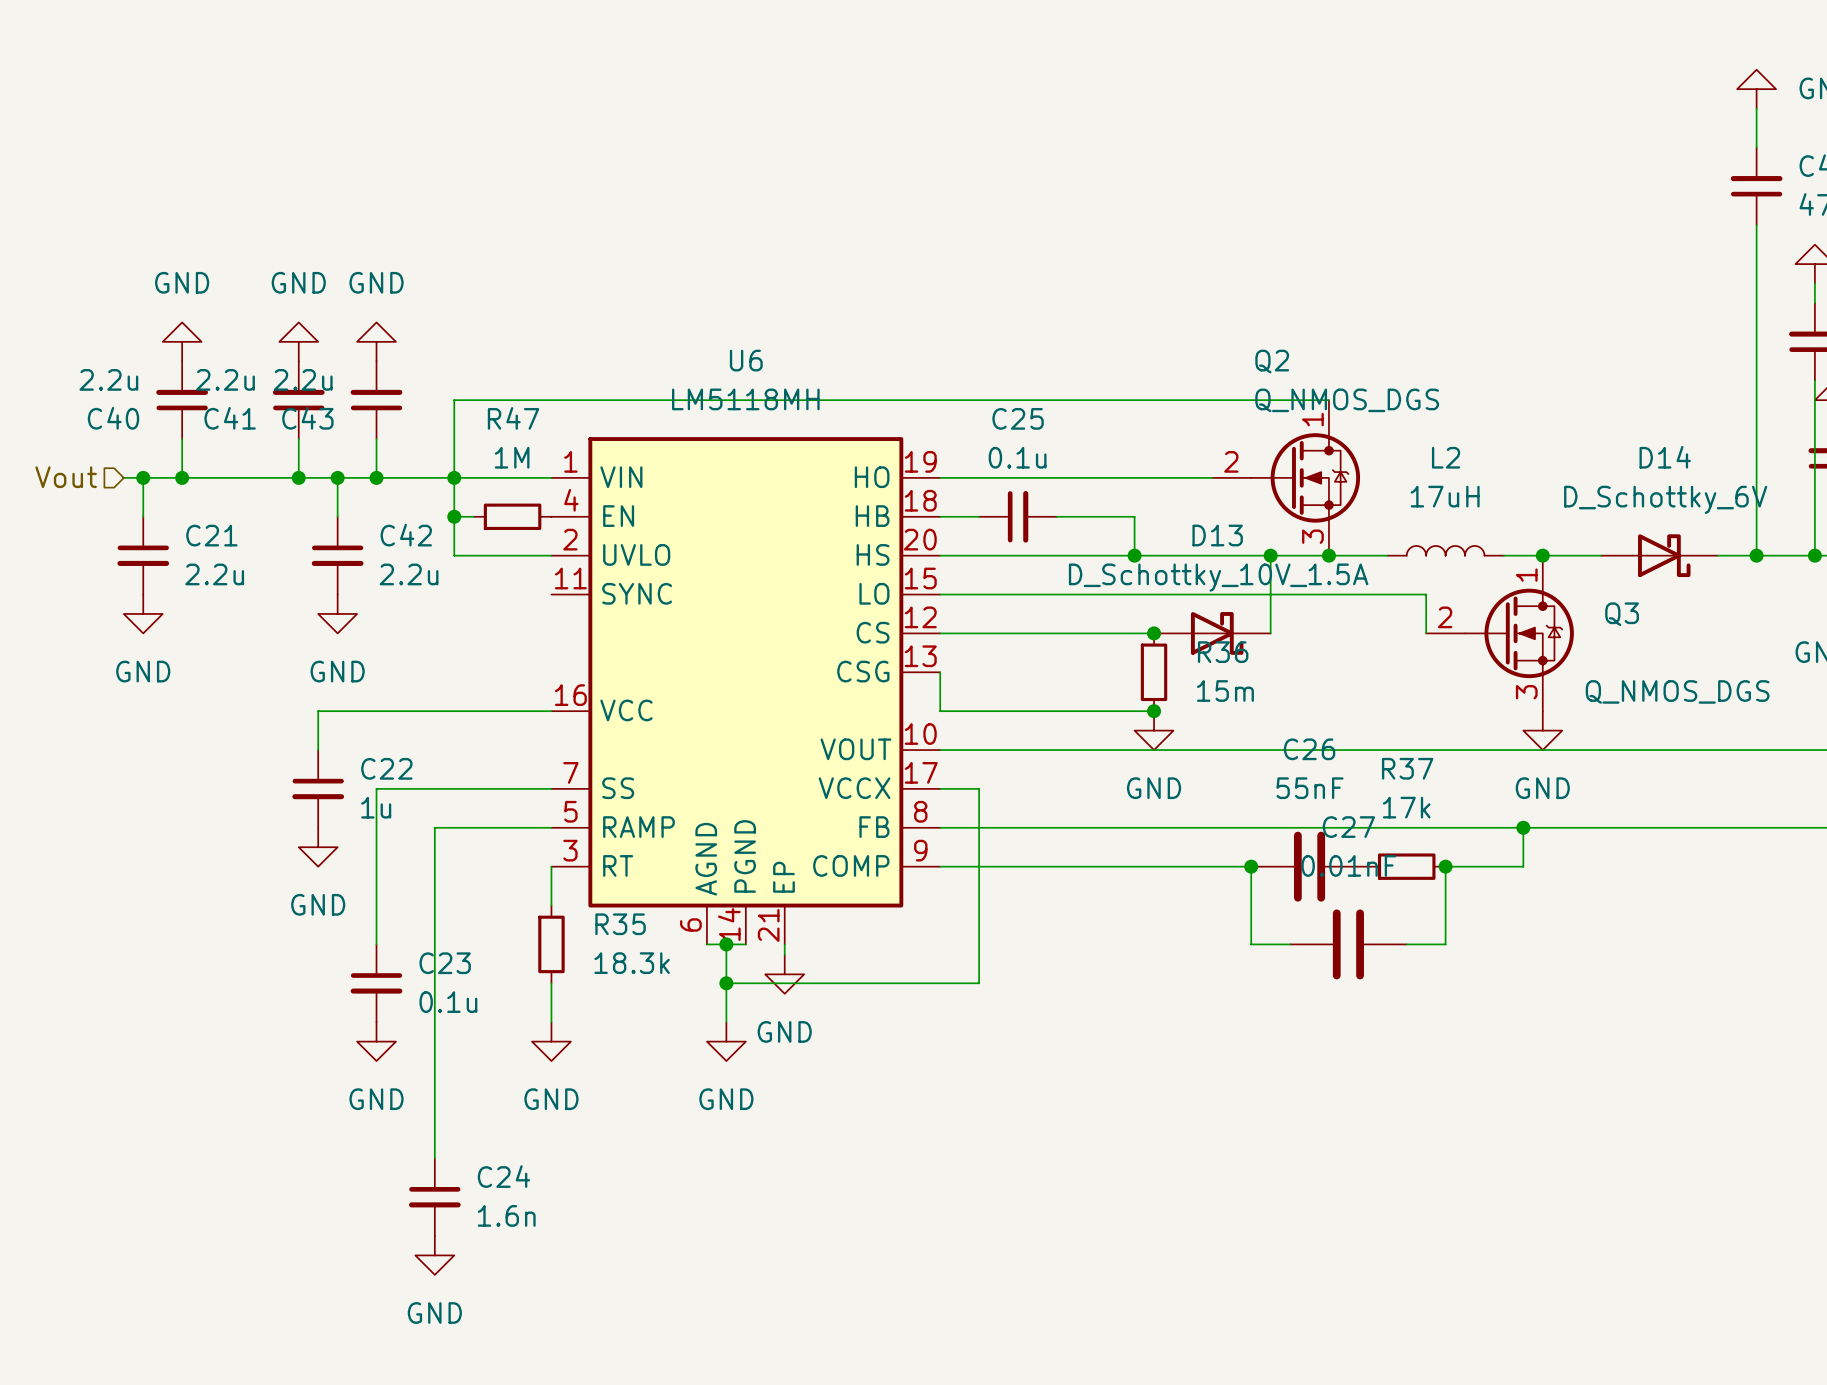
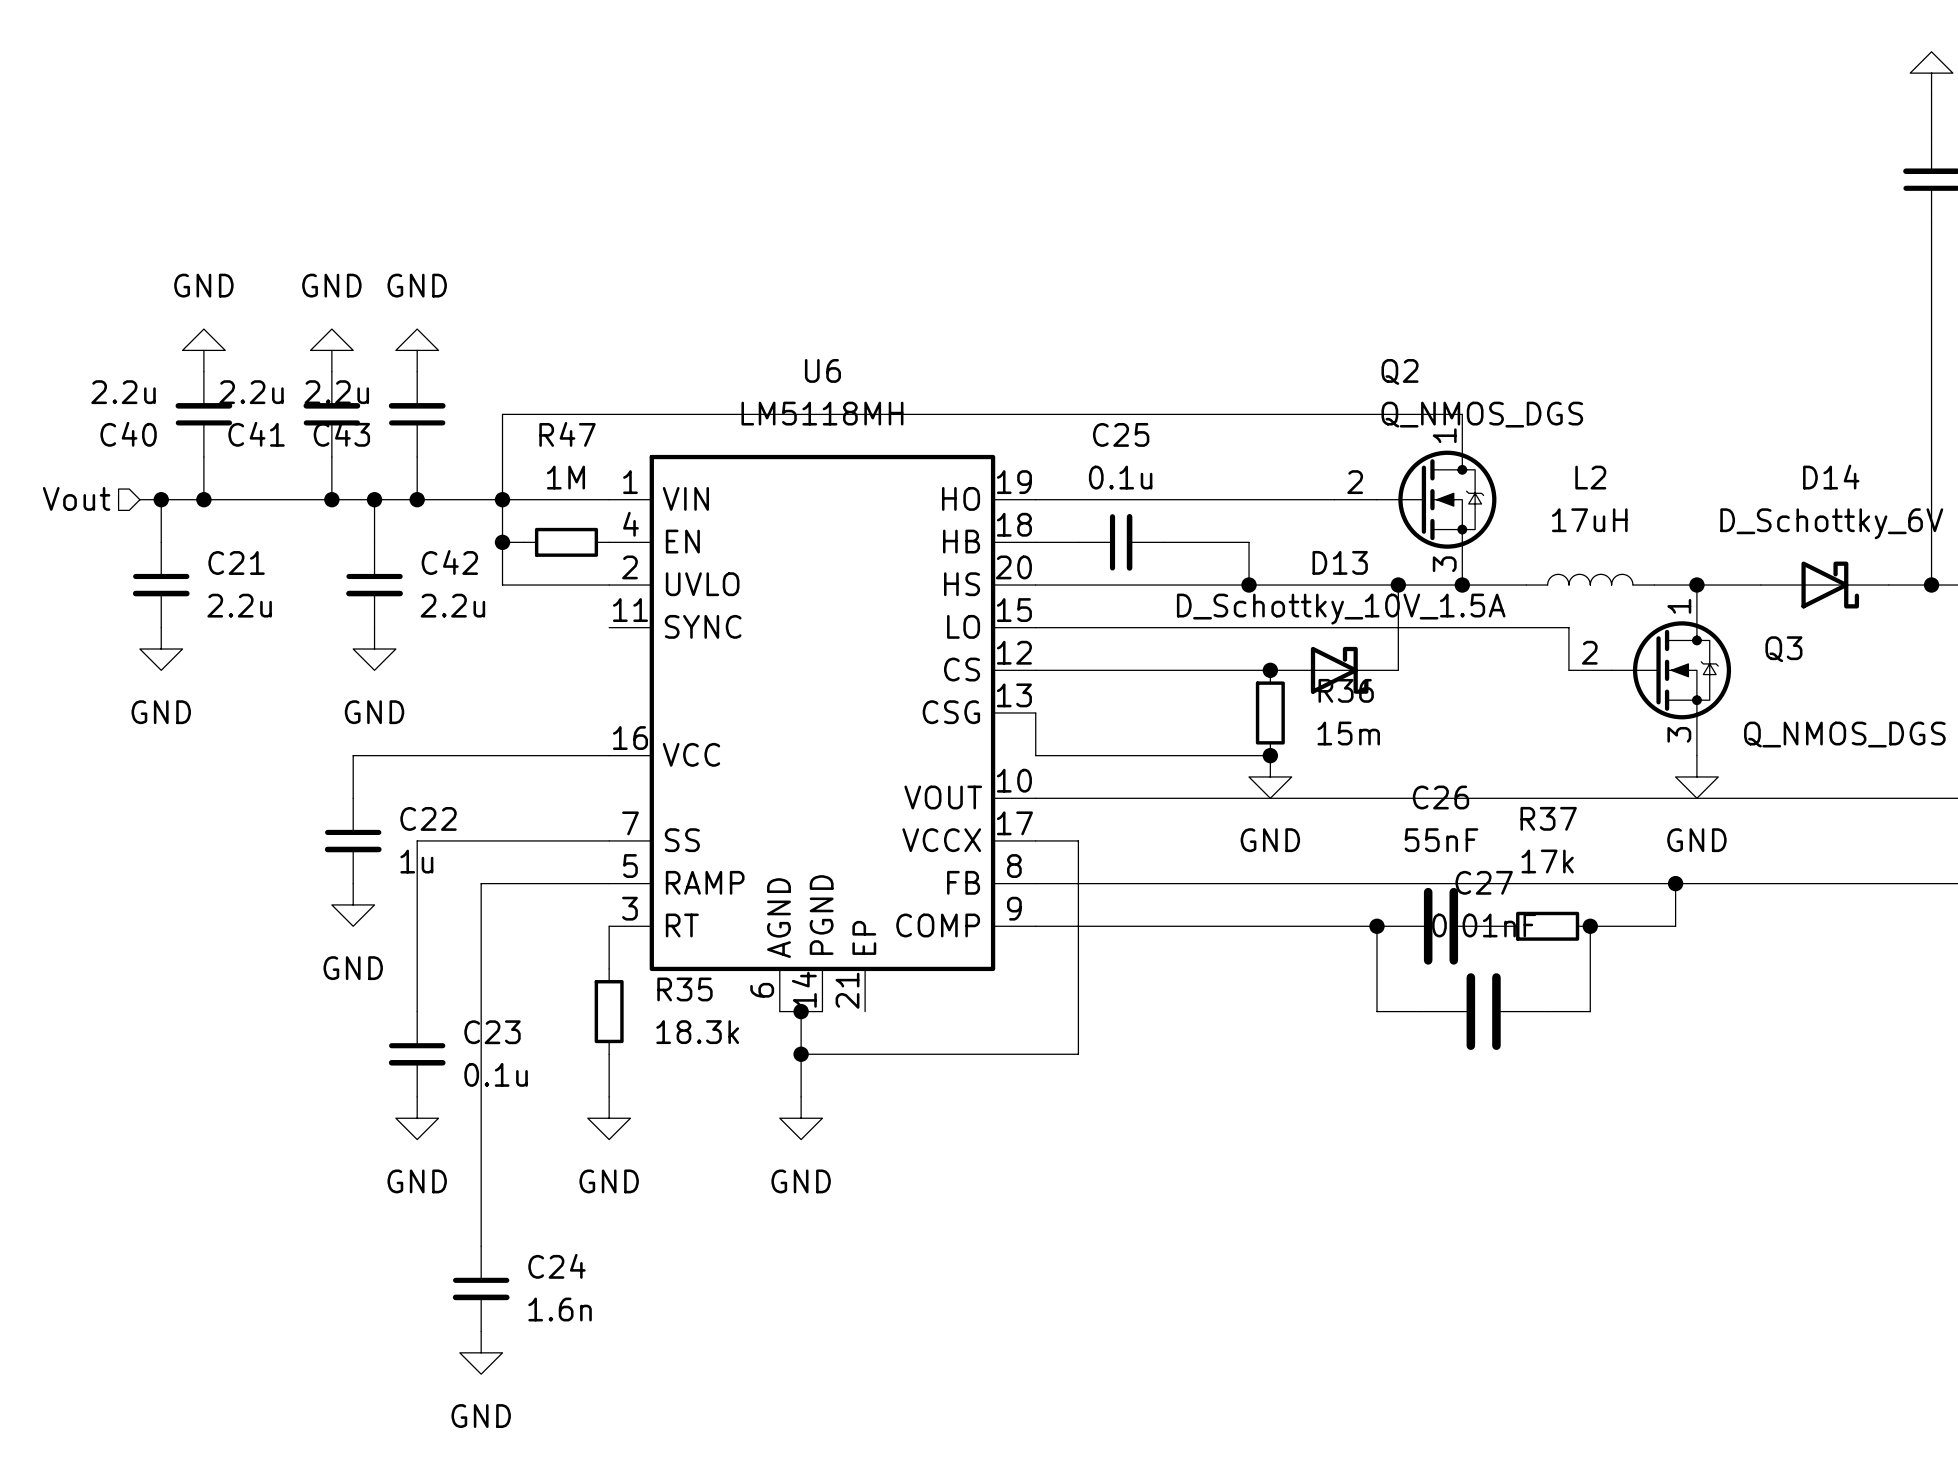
wire: (784, 944) (784, 954) -> none
power symbol: GND (784, 974) -> none

